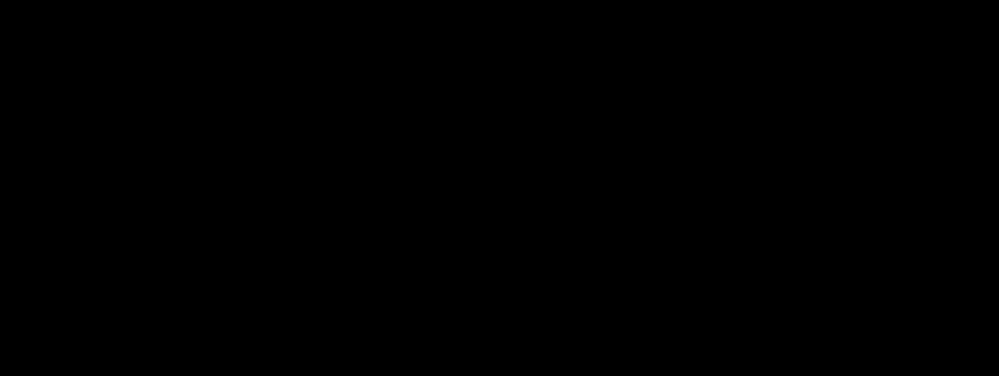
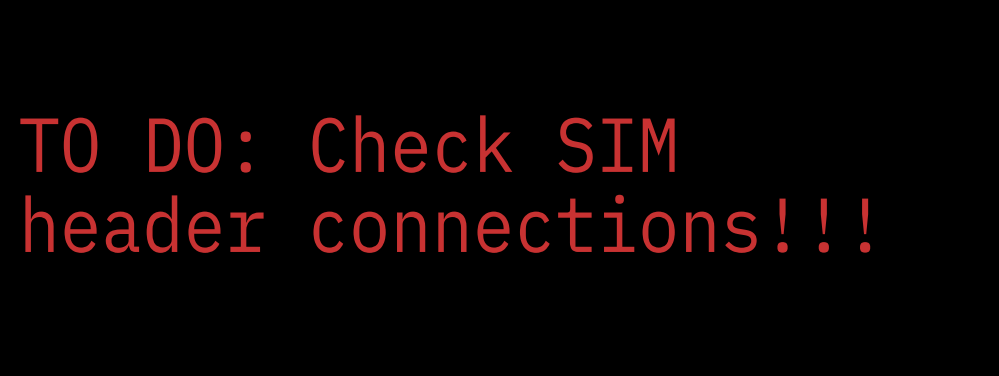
text: none -> TO DO: Check SIM (347, 144)
text: none -> header connections!!! (447, 223)

